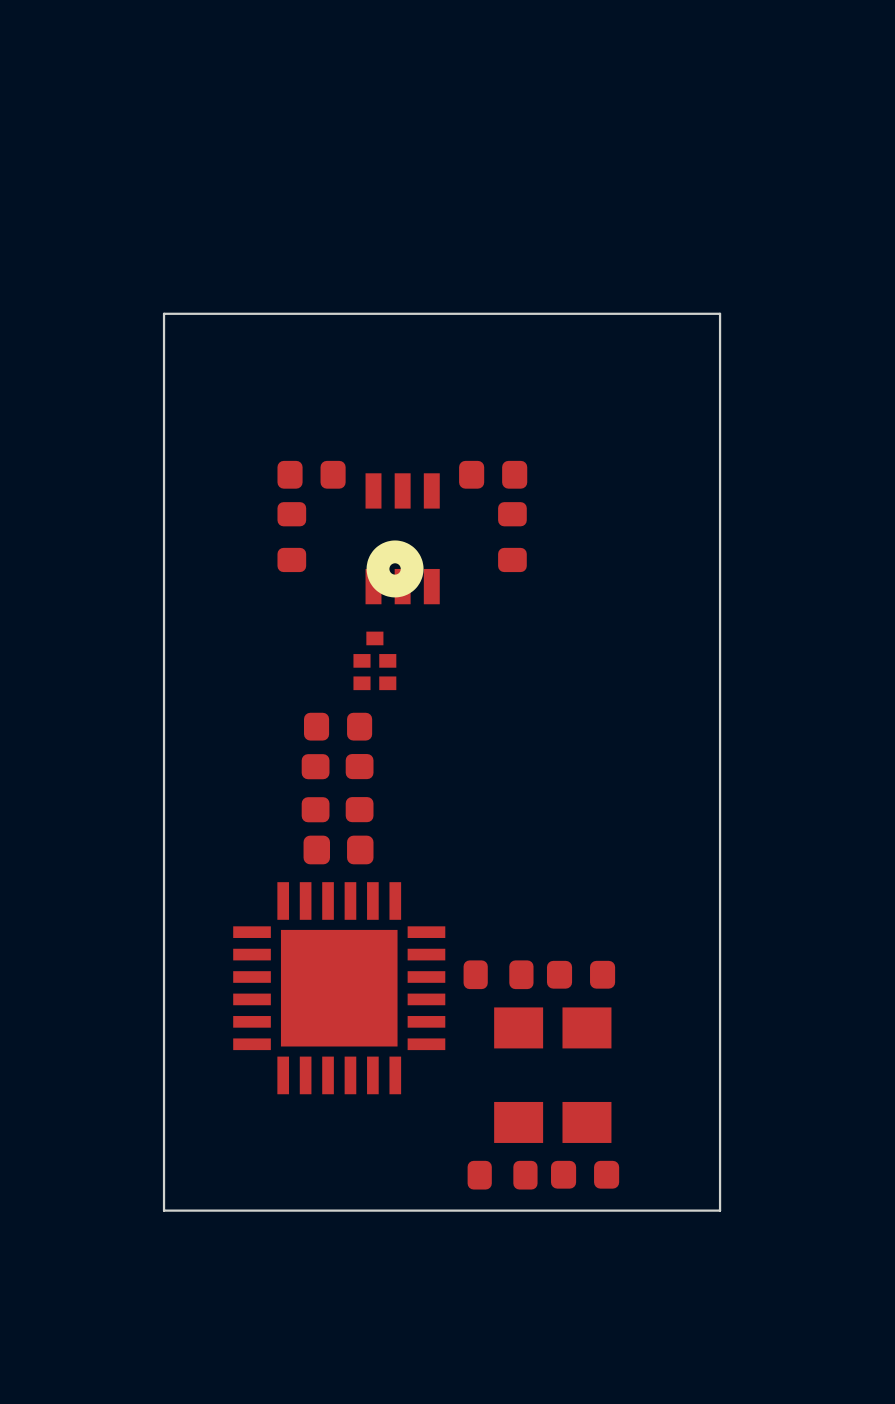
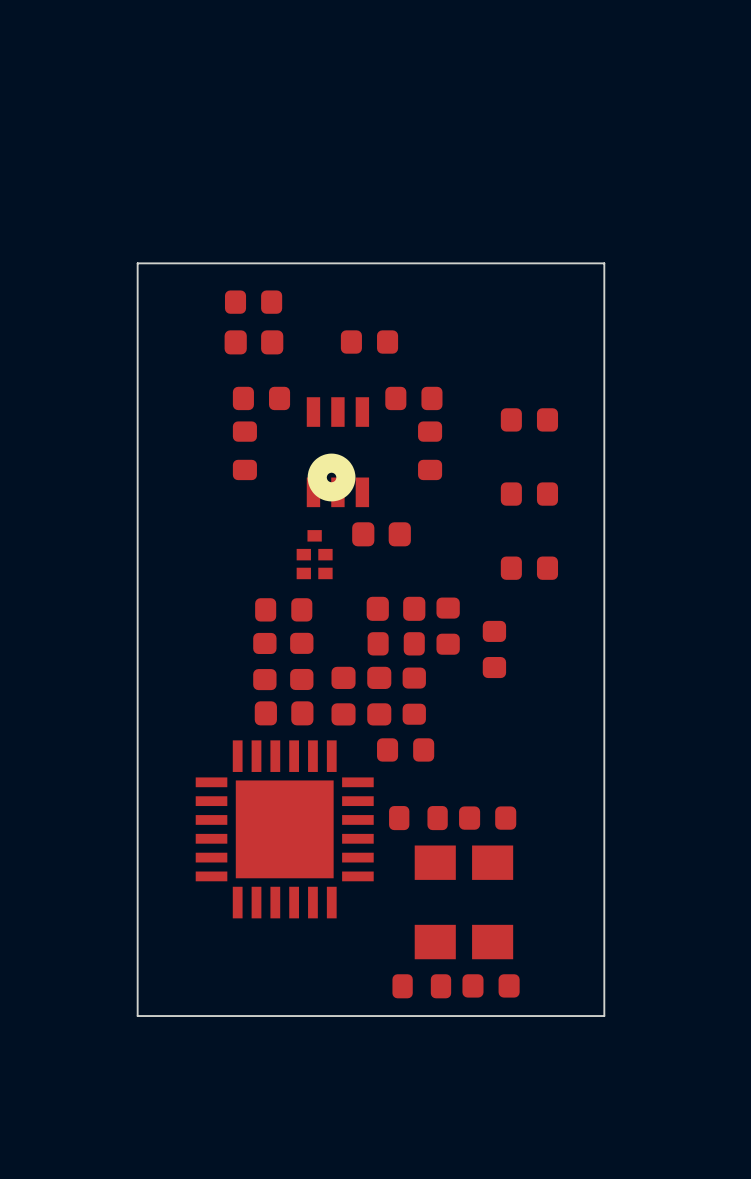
part: none -> (253, 302)
part: none -> (253, 342)
part: none -> (369, 342)
part: none -> (529, 419)
part: none -> (529, 494)
part: none -> (381, 534)
part: none -> (529, 568)
part: none -> (396, 608)
part: none -> (448, 626)
part: none -> (396, 643)
part: none -> (494, 649)
part: none -> (343, 696)
part: none -> (379, 696)
part: none -> (414, 696)
part: none -> (405, 749)

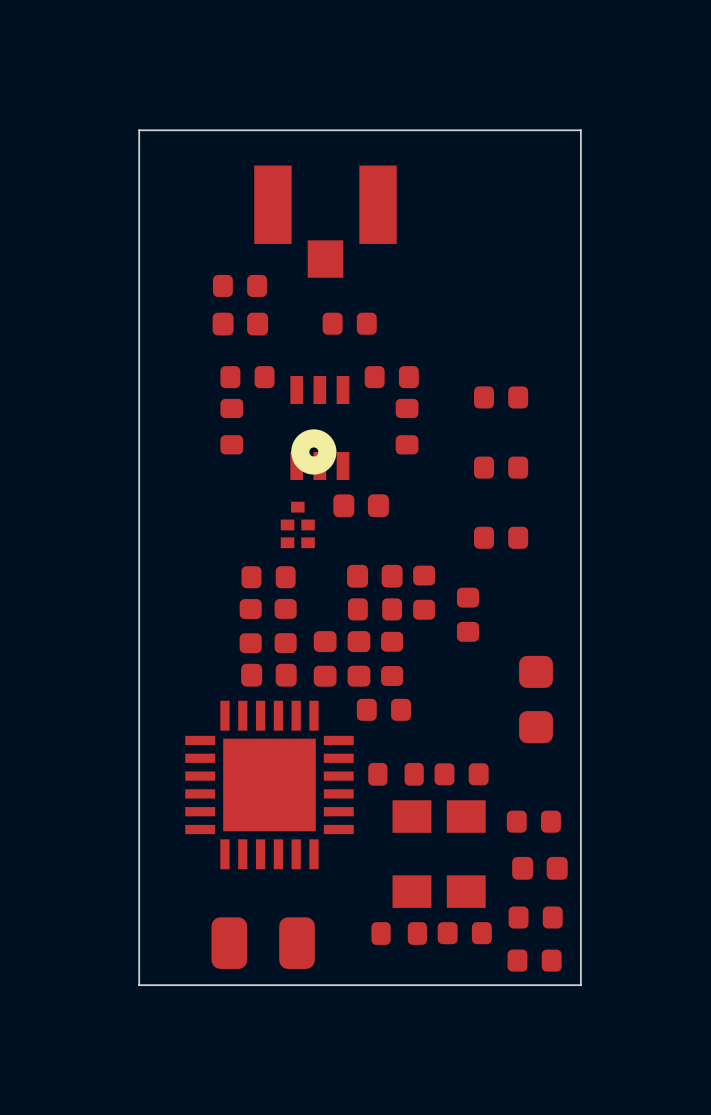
part: none -> (325, 221)
board edge: (604, 263) (137, 263) (137, 1016) (604, 1016) (604, 263) -> (580, 130) (580, 985) (139, 985) (139, 130) (580, 130)
part: none -> (536, 699)
part: none -> (533, 821)
part: none -> (539, 868)
part: none -> (535, 917)
part: none -> (263, 943)
part: none -> (534, 960)

